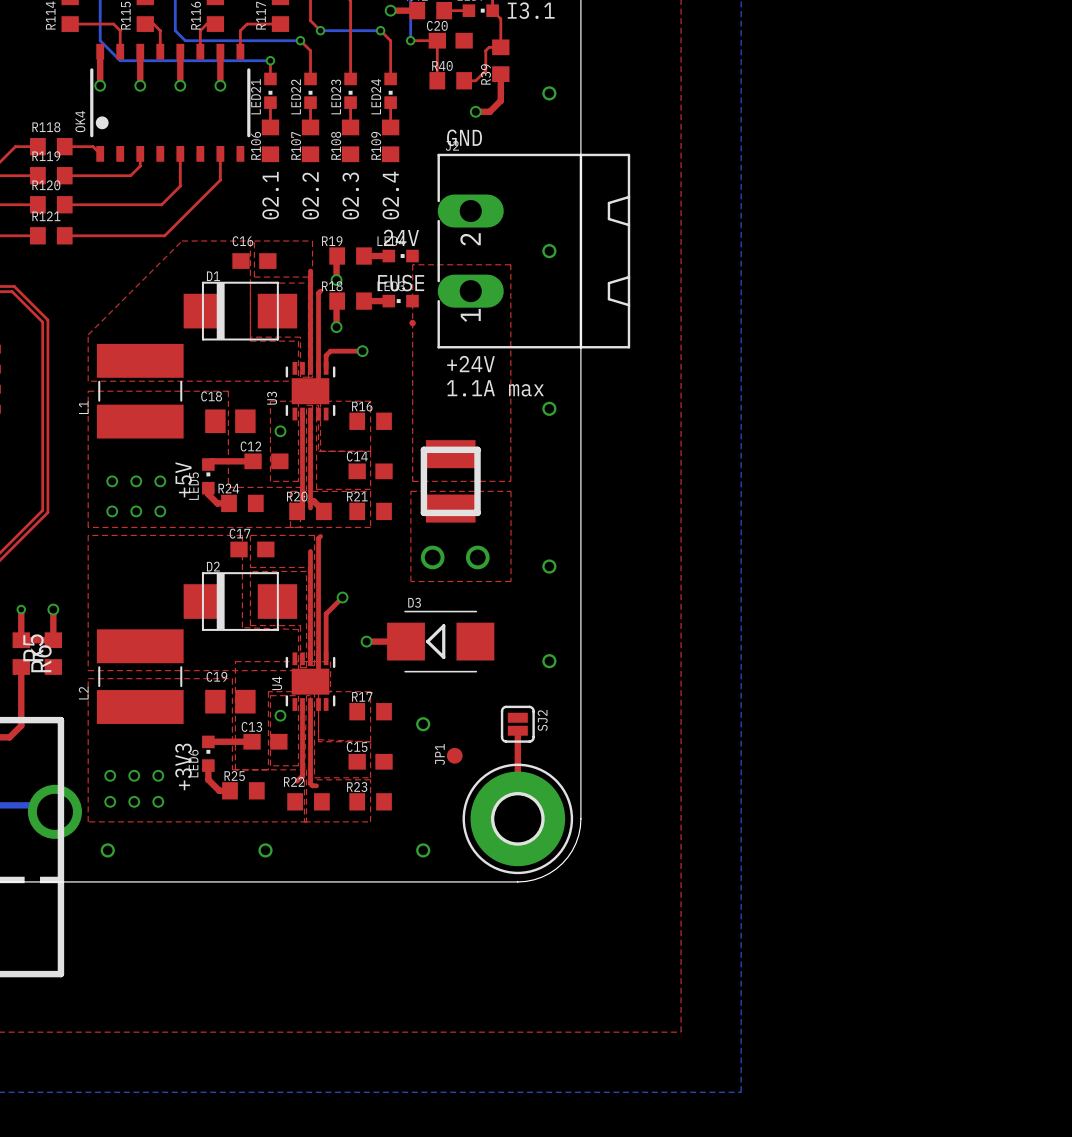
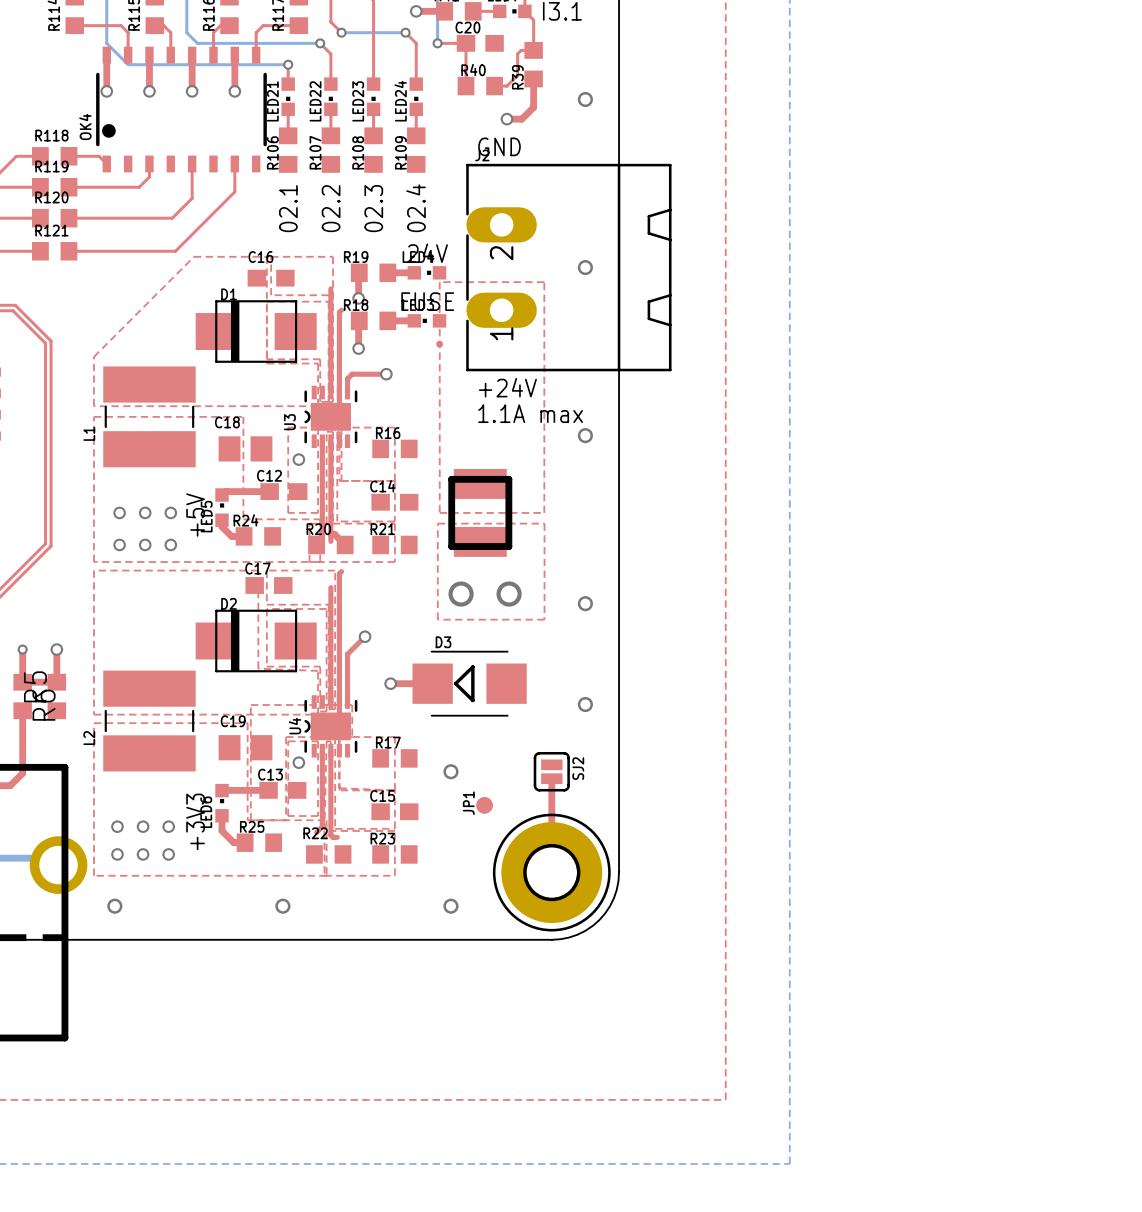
U3 footprint: [285, 361, 336, 421] -> [304, 385, 358, 449]
U4 footprint: [285, 652, 336, 711] -> [304, 695, 358, 758]

